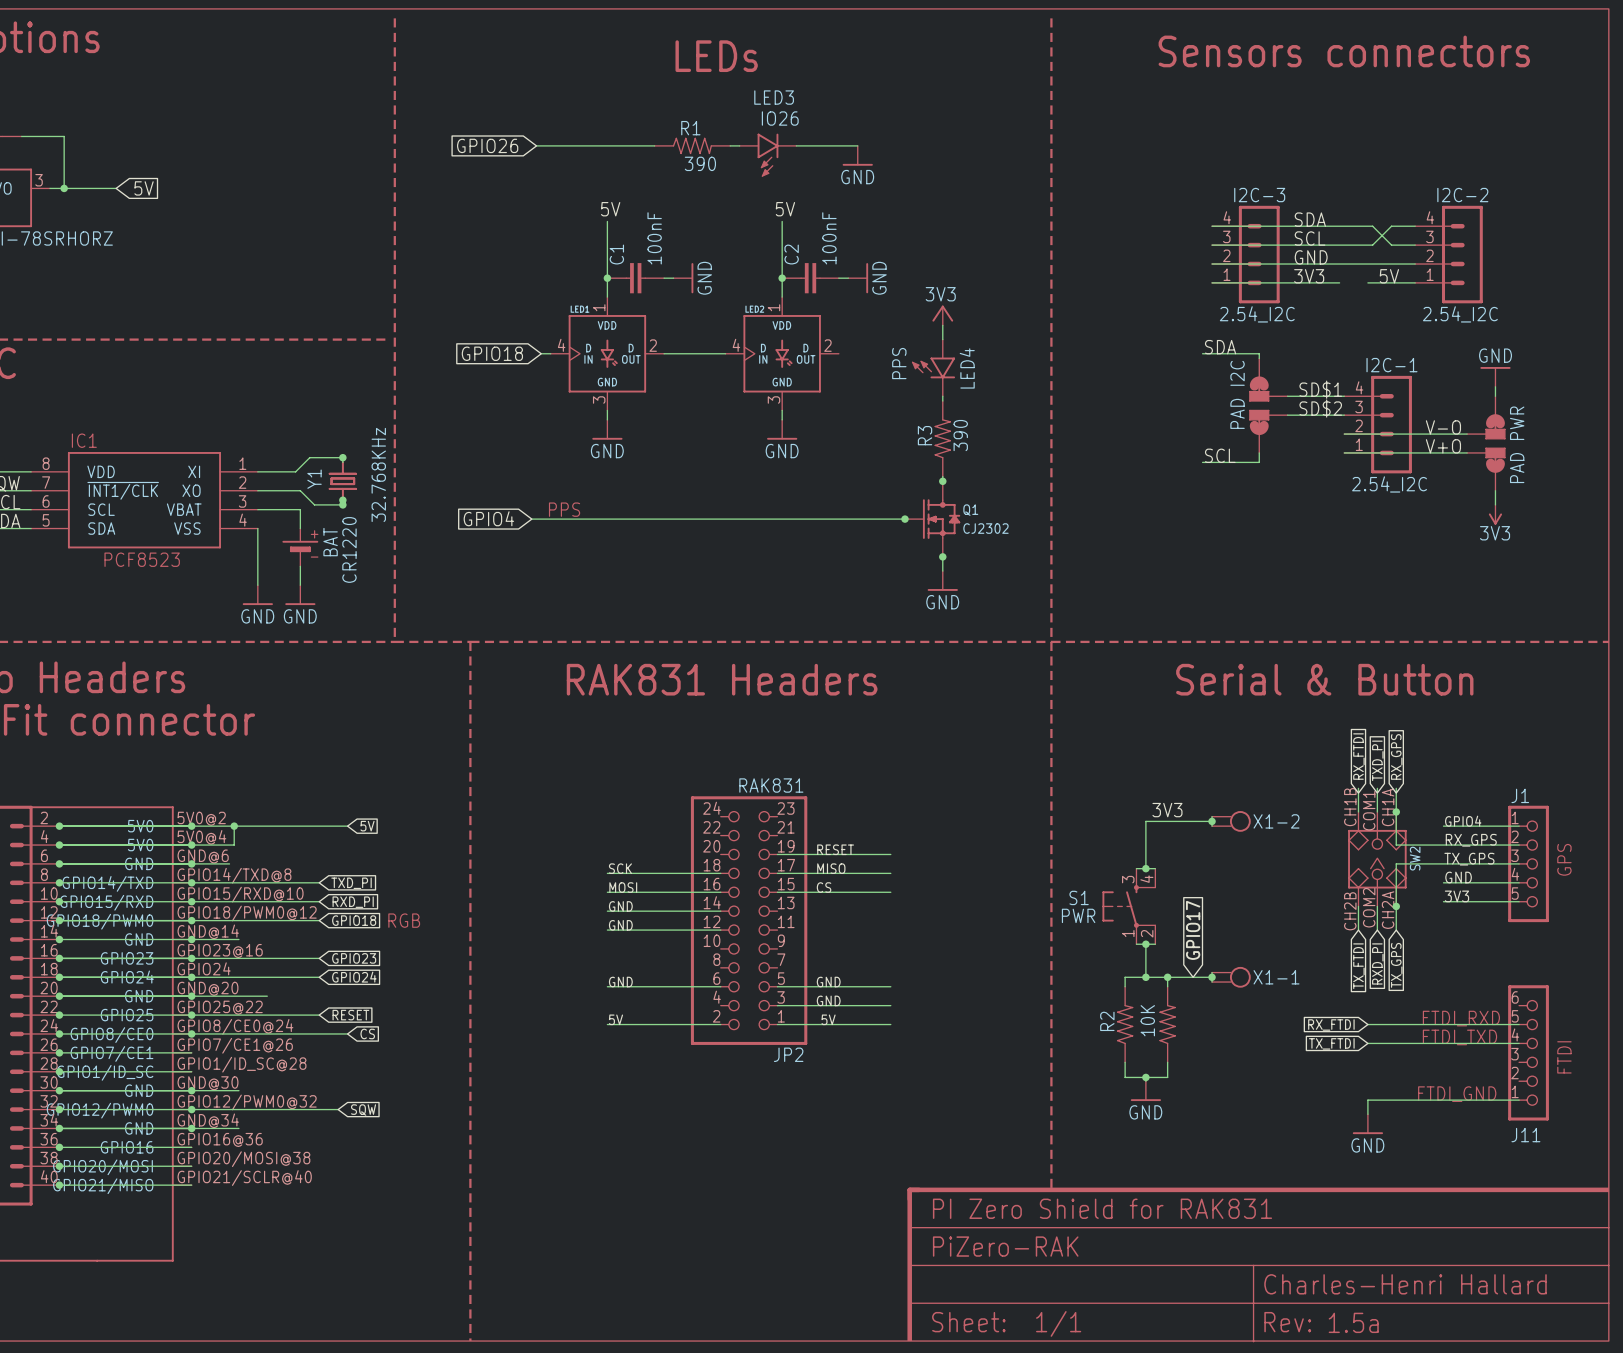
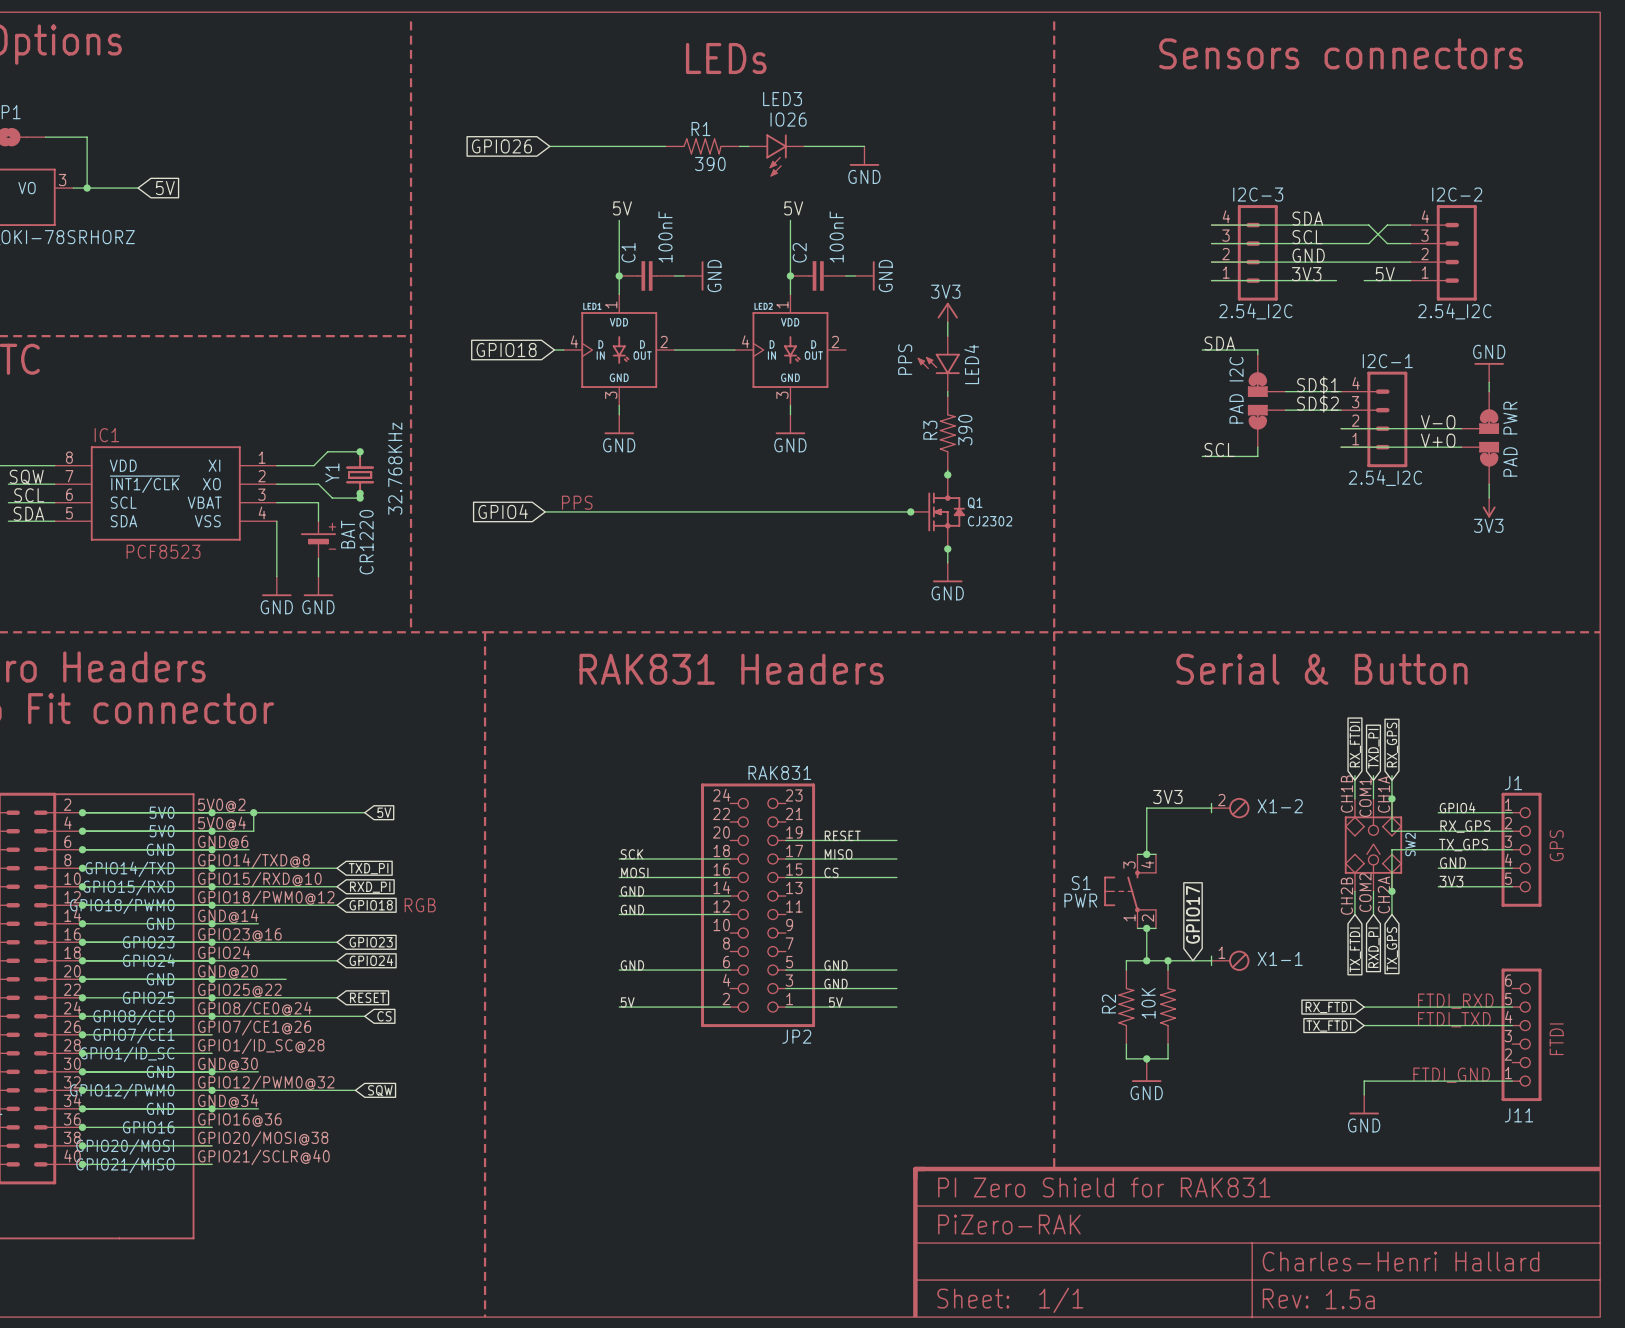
X1-2 symbol: [1212, 811, 1251, 832] -> [1211, 797, 1250, 819]
junction: (1212, 821) -> none
X1-1 symbol: [1212, 966, 1251, 988] -> [1211, 950, 1250, 971]
junction: (1212, 977) -> none

